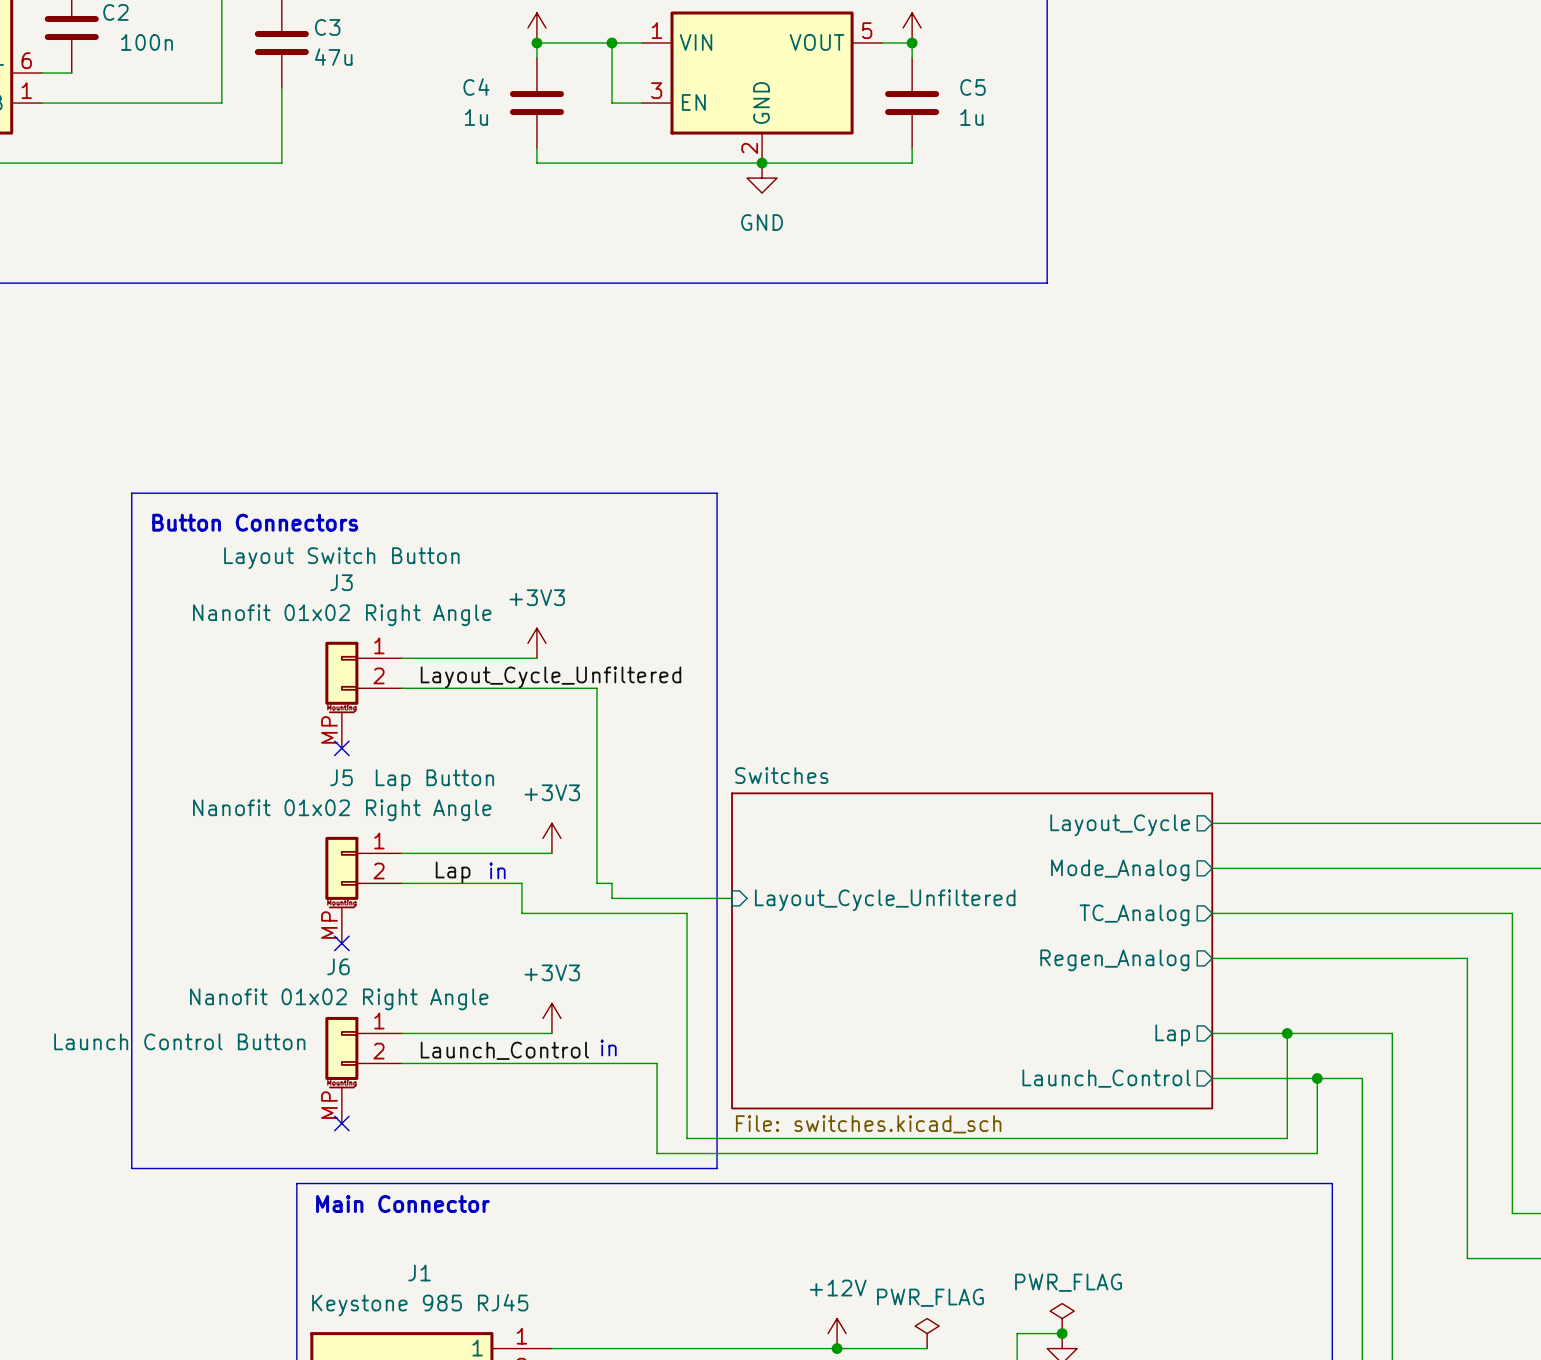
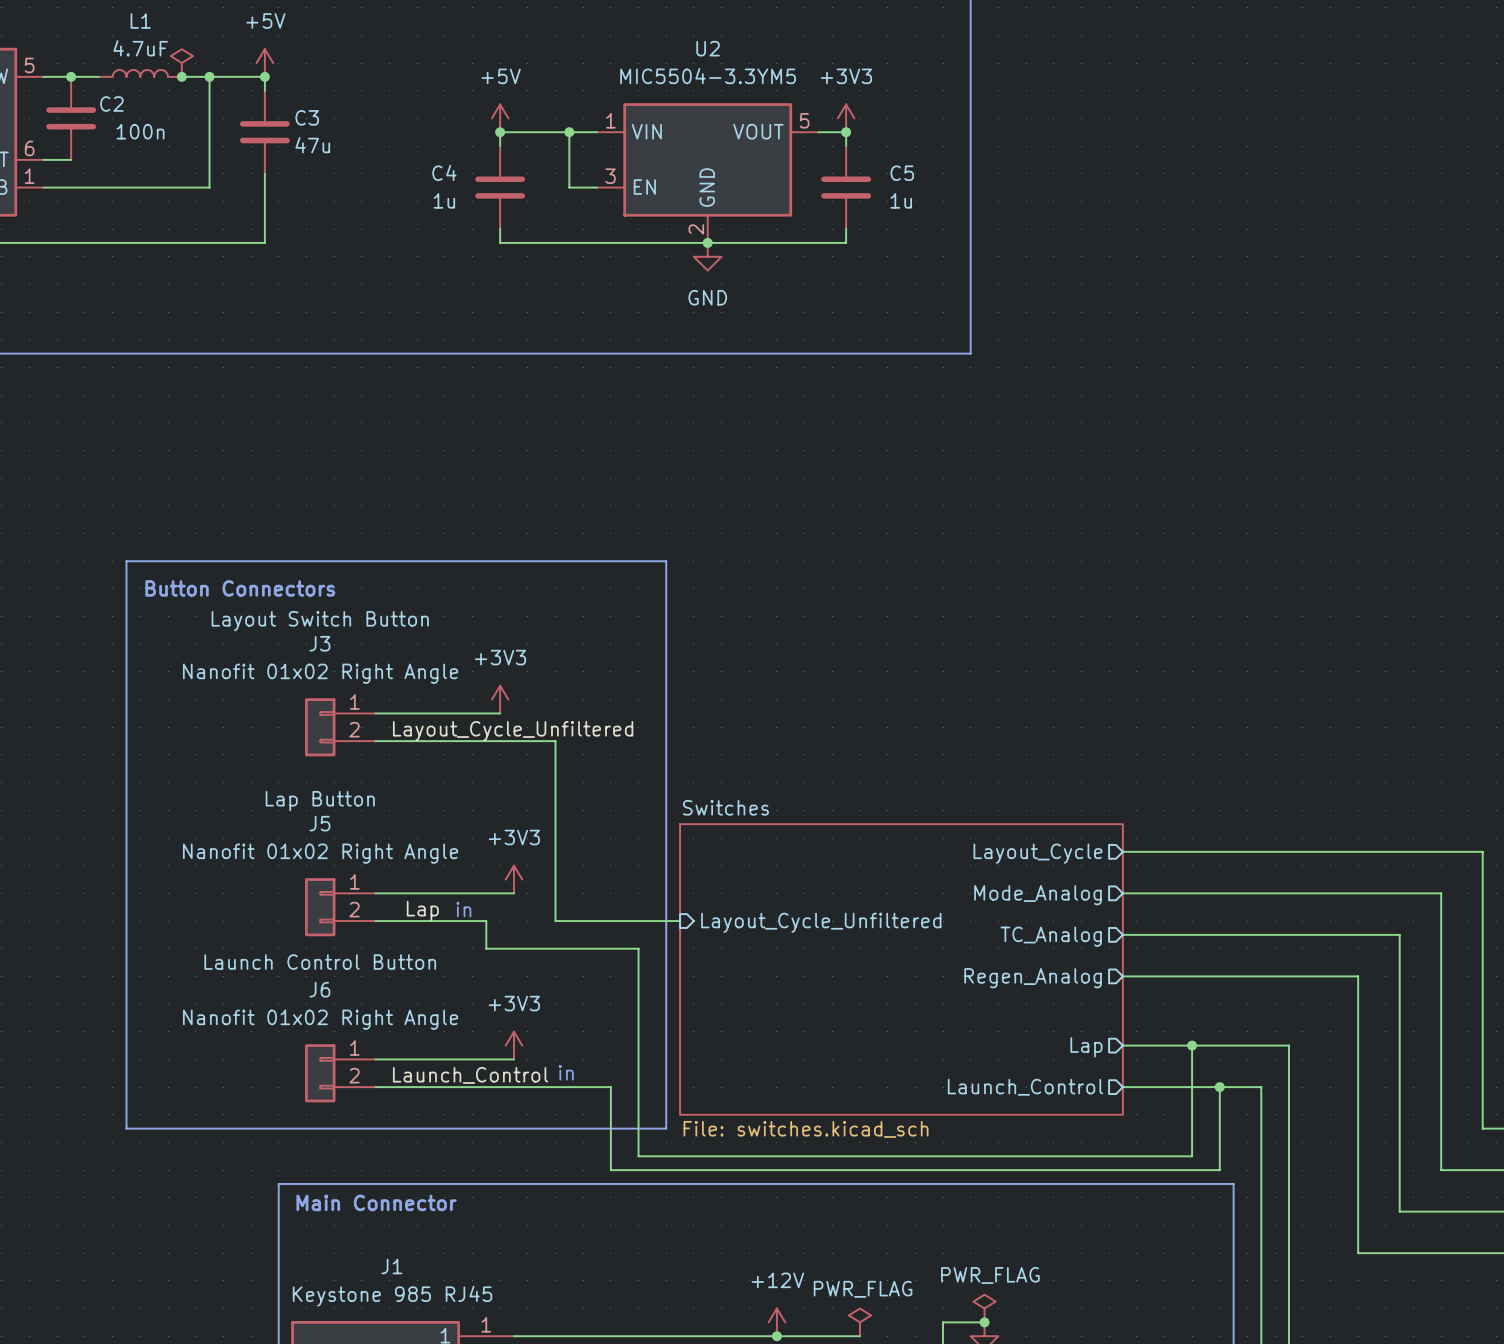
line: (131, 508) (131, 493) (717, 493) (717, 508) -> (126, 561) (666, 561)
text position: Button Connectors (255, 522) -> Button Connectors (240, 588)
J3 symbol: [325, 641, 402, 749] -> [305, 698, 376, 757]
power symbol position: +3V3 (536, 643) -> +3V3 (500, 699)
wire: (401, 658) (536, 658) -> (375, 713) (500, 713)
label position: Layout_Cycle_Unfiltered (550, 677) -> Layout_Cycle_Unfiltered (513, 731)
wire: (401, 688) (596, 688) (596, 703) -> (375, 741) (555, 741)
no-connect mark: (341, 748) -> none
J5 text position: Lap Button (434, 780) -> Lap Button (320, 801)
J5 symbol: [325, 836, 402, 944] -> [305, 878, 376, 937]
power symbol position: +3V3 (551, 838) -> +3V3 (513, 879)
wire: (401, 853) (551, 853) -> (375, 893) (513, 893)
text position: in (497, 870) -> in (463, 909)
label position: Lap (453, 872) -> Lap (422, 911)
wire: (401, 883) (521, 883) (521, 898) -> (375, 921) (486, 921)
wire: (596, 883) (611, 883) (611, 898) -> (555, 907) (555, 921) (569, 921)
wire: (521, 913) (687, 913) (687, 928) -> (486, 934) (486, 948) (638, 948)
no-connect mark: (341, 943) -> none
J6 symbol: [325, 1016, 402, 1124] -> [305, 1044, 376, 1103]
power symbol position: +3V3 (551, 1018) -> +3V3 (513, 1045)
wire: (401, 1033) (551, 1033) -> (375, 1059) (513, 1059)
J6 text position: Launch Control Button (179, 1041) -> Launch Control Button (320, 962)
text position: in (608, 1047) -> in (566, 1072)
label position: Launch_Control (504, 1050) -> Launch_Control (470, 1075)
wire: (401, 1063) (657, 1063) (657, 1078) -> (375, 1087) (610, 1087)
line: (131, 1123) (131, 1168) (717, 1168) (717, 1123) -> (126, 1128) (666, 1128)
no-connect mark: (341, 1123) -> none
wire: (687, 1138) (1287, 1138) -> none
wire: (657, 1153) (687, 1153) -> (638, 1142) (638, 1156)
wire: none -> (610, 1156) (610, 1170) (1219, 1170) (1219, 1156)
wire: (1287, 1153) (1317, 1153) -> (1192, 1156) (1192, 1142)

